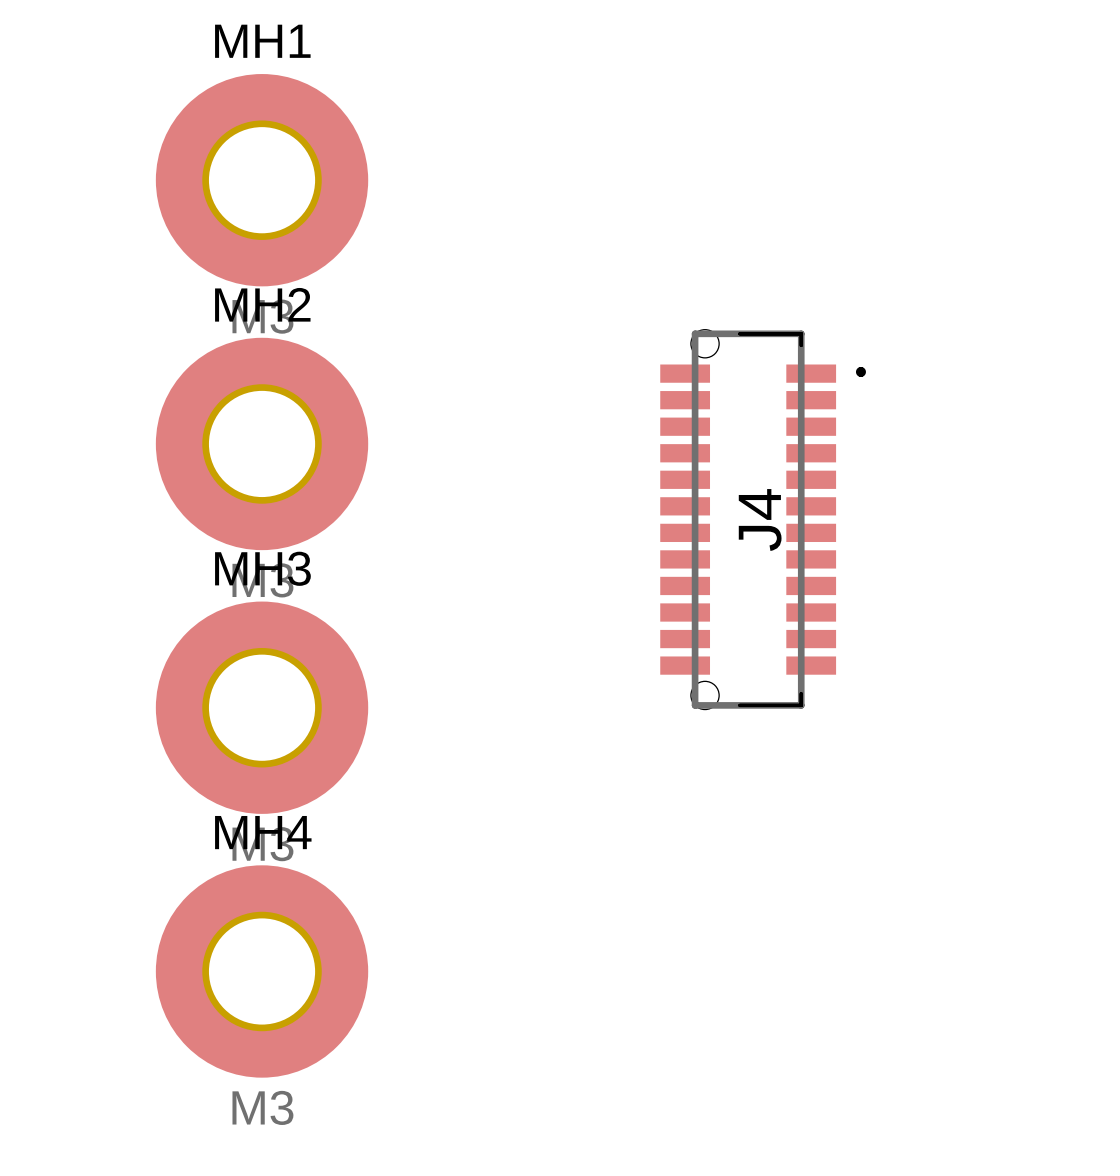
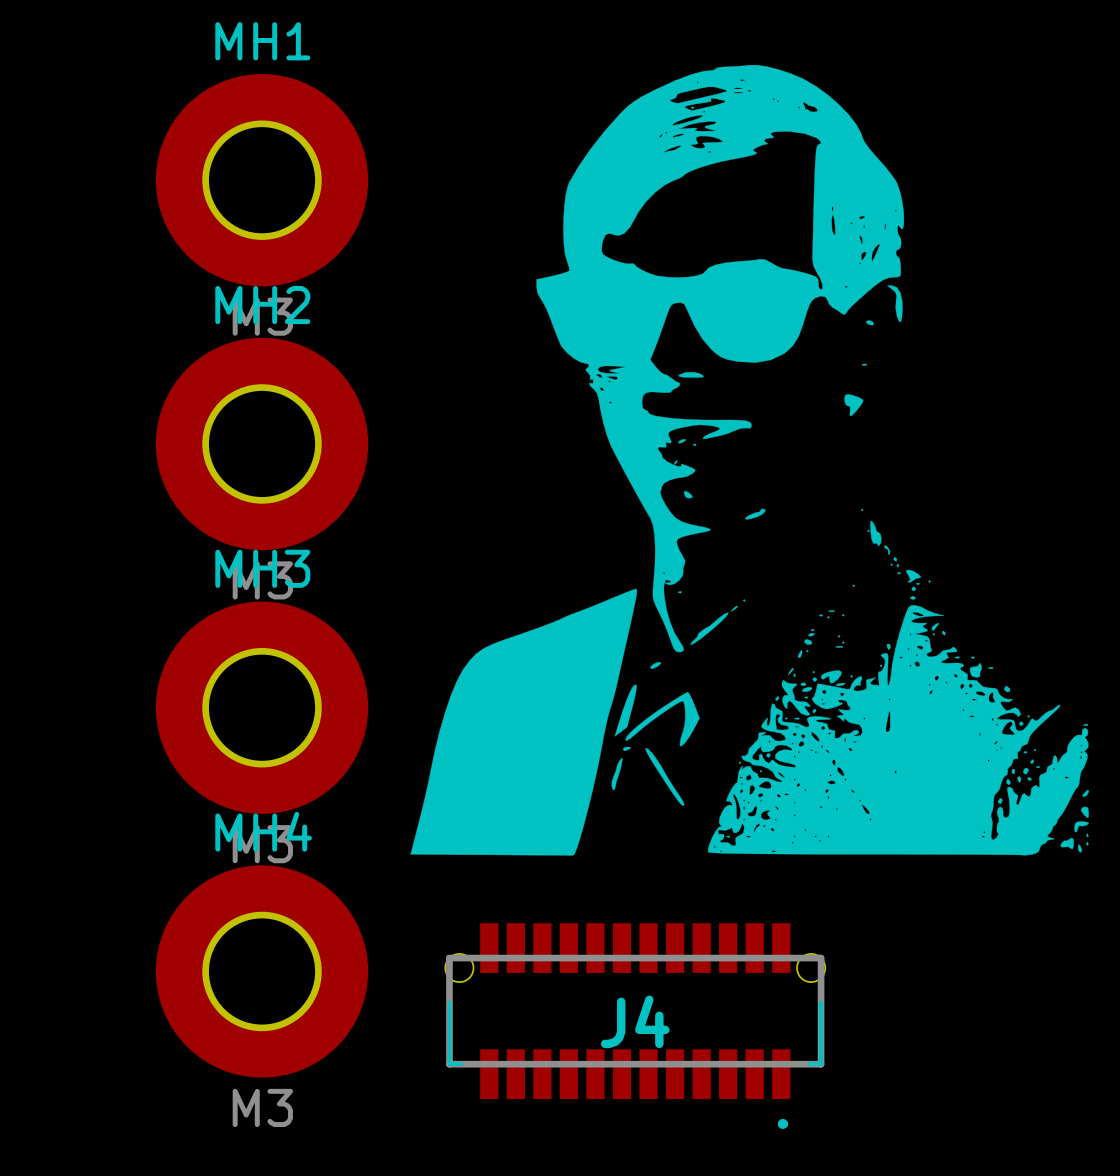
drawing: none -> [410, 64, 1089, 856]
J4 rotation: 0° (763, 519) -> 90° clockwise (635, 1026)
J4 position: (763, 519) -> (635, 1026)

